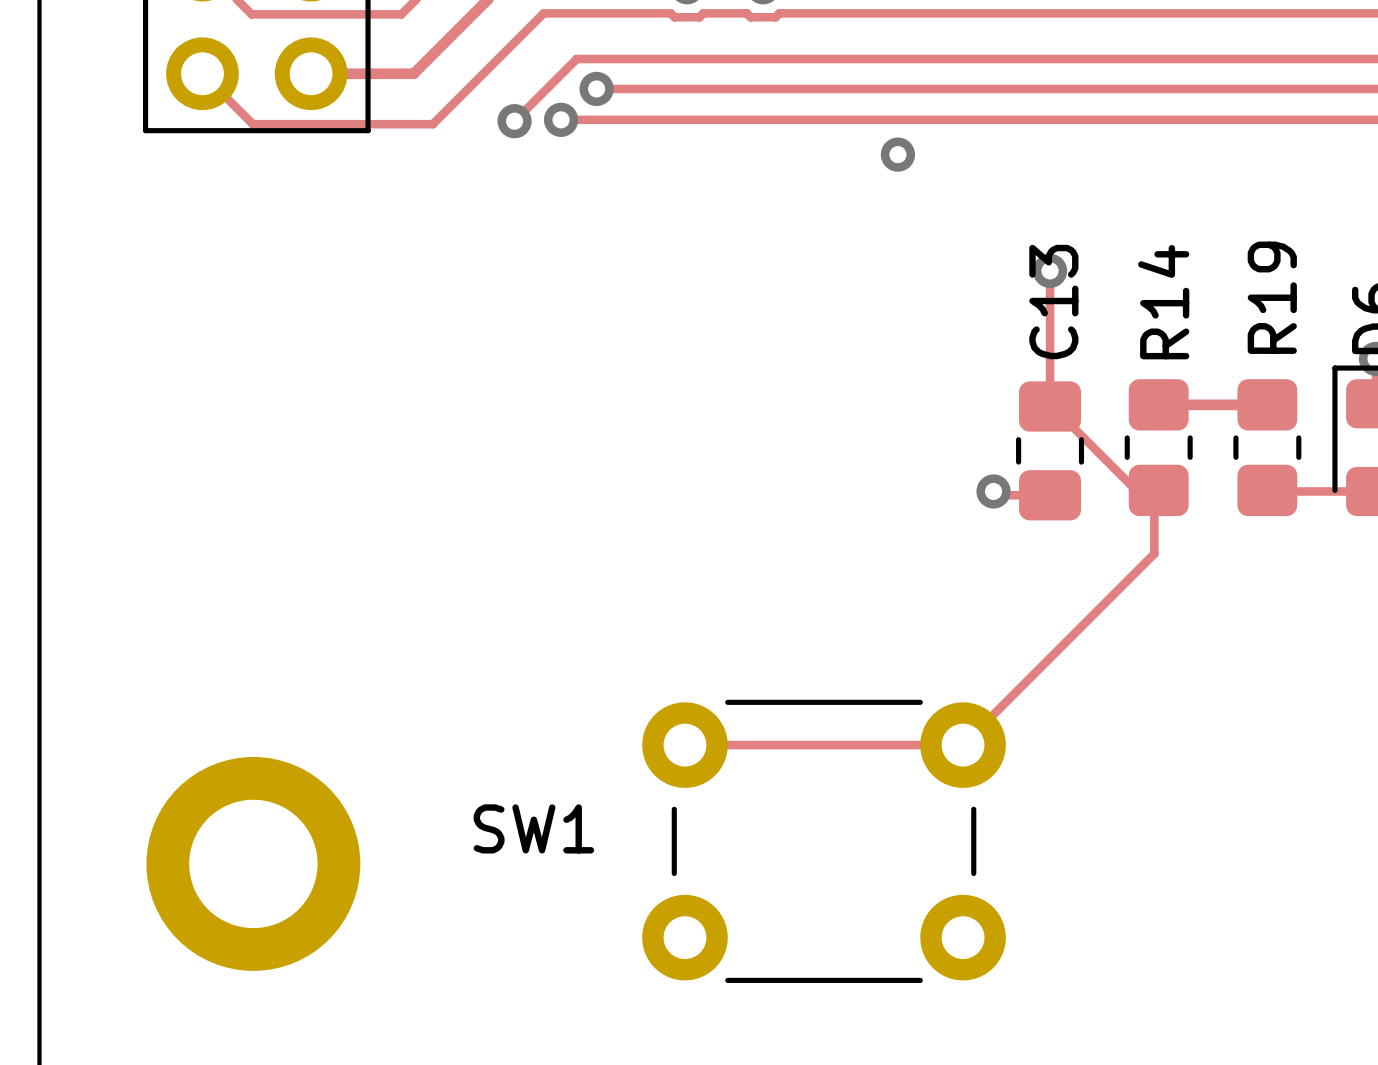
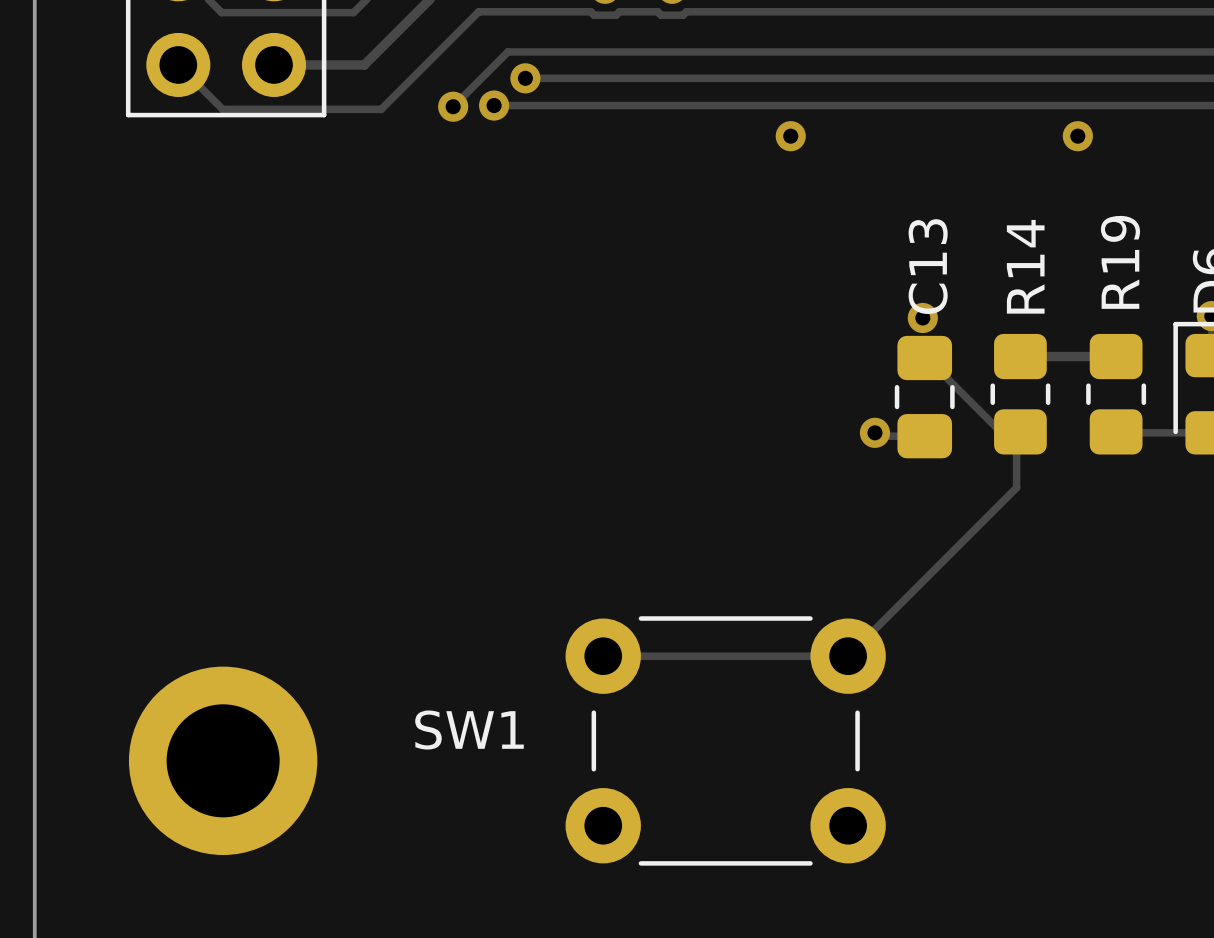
via: none -> (1077, 136)
track: (1050, 270) (1050, 406) -> none
via position: (1050, 270) -> (922, 317)

